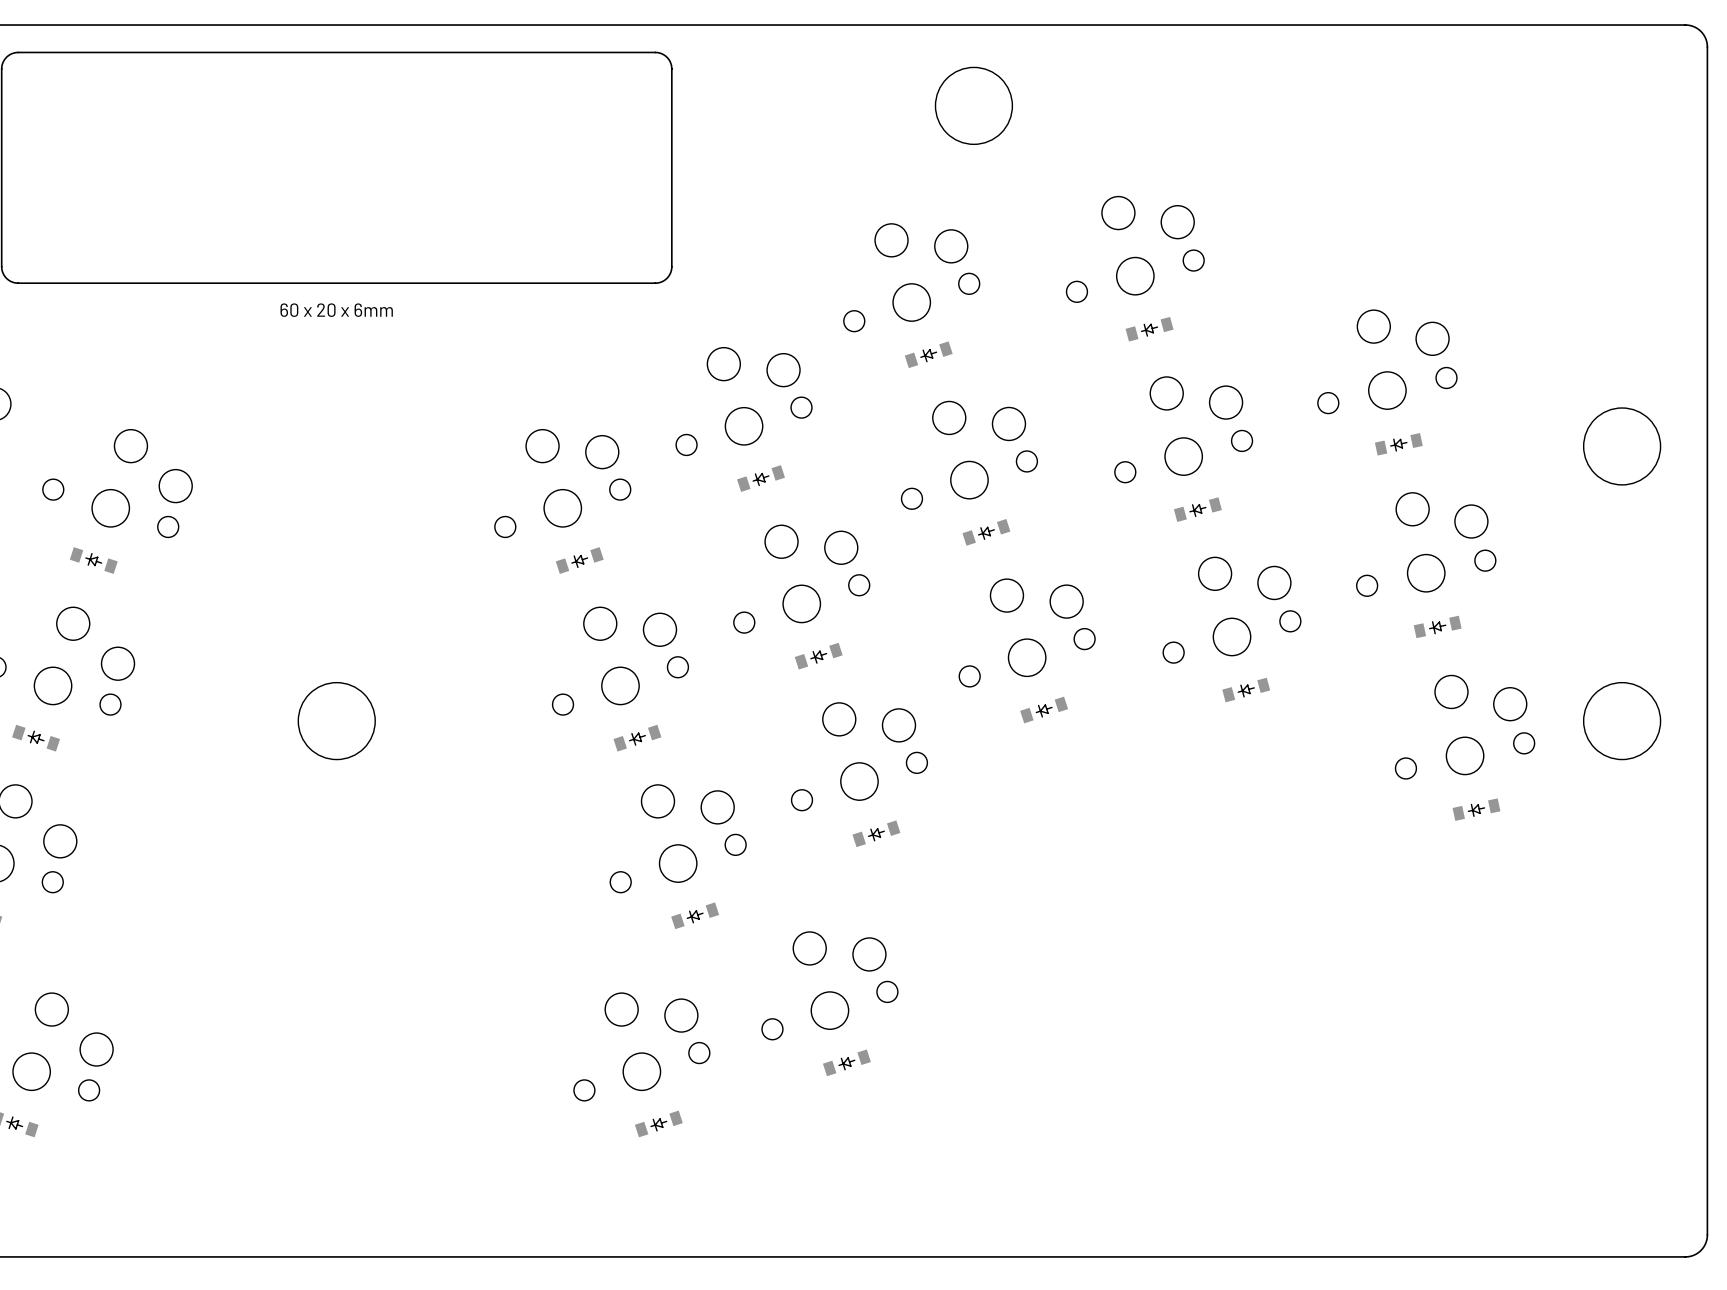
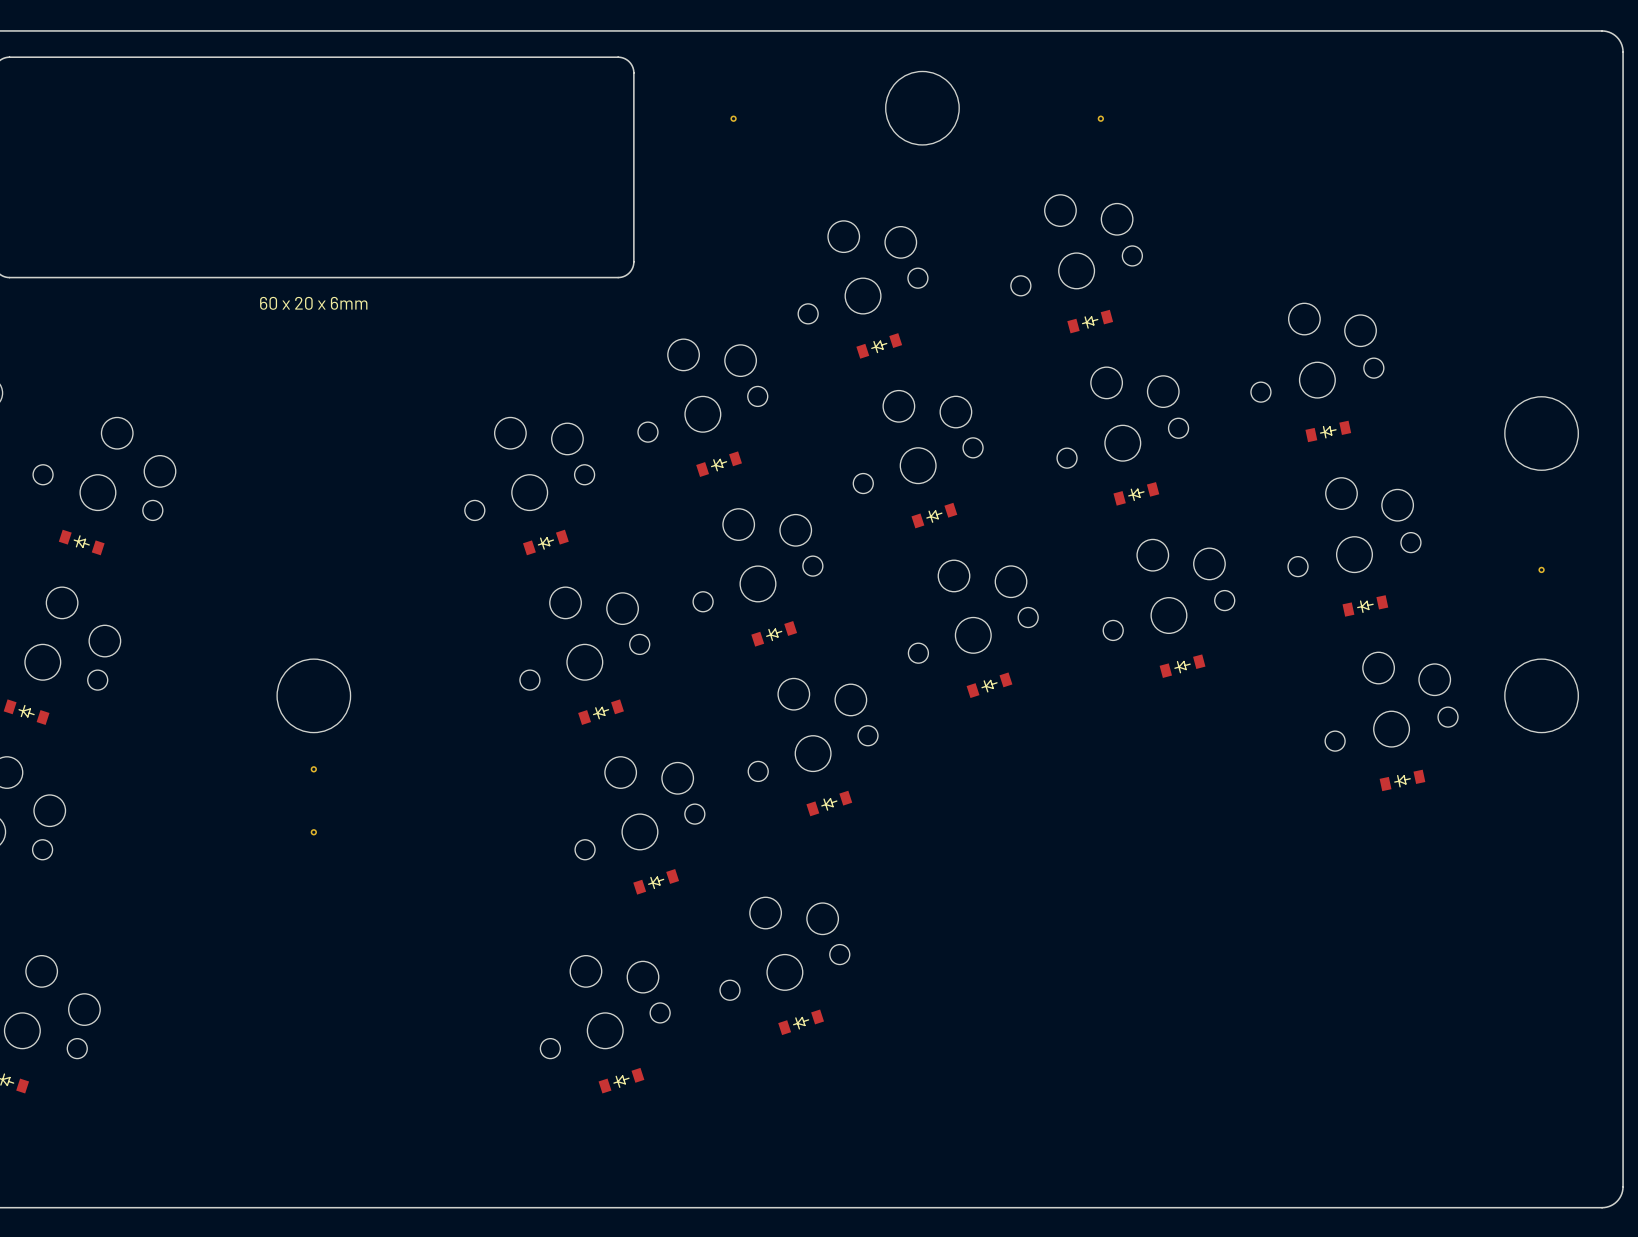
part: none -> (733, 118)
part: none -> (1100, 118)
part: none -> (1541, 569)
part: none -> (313, 769)
part: none -> (313, 832)

